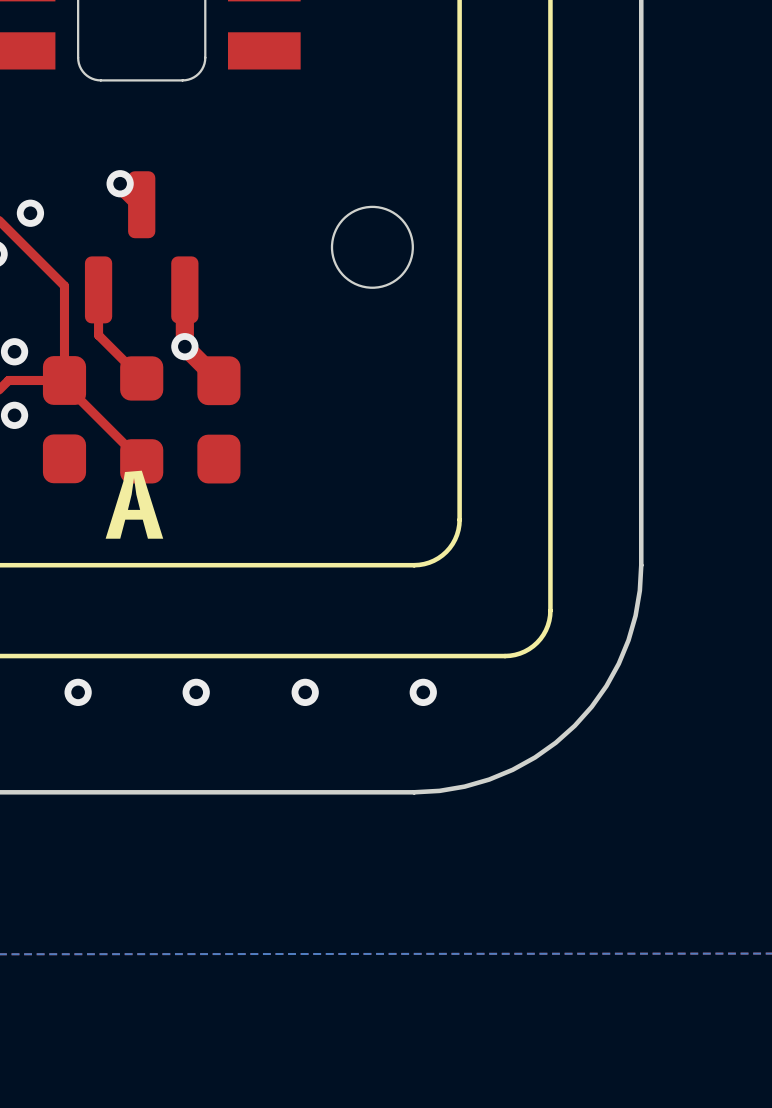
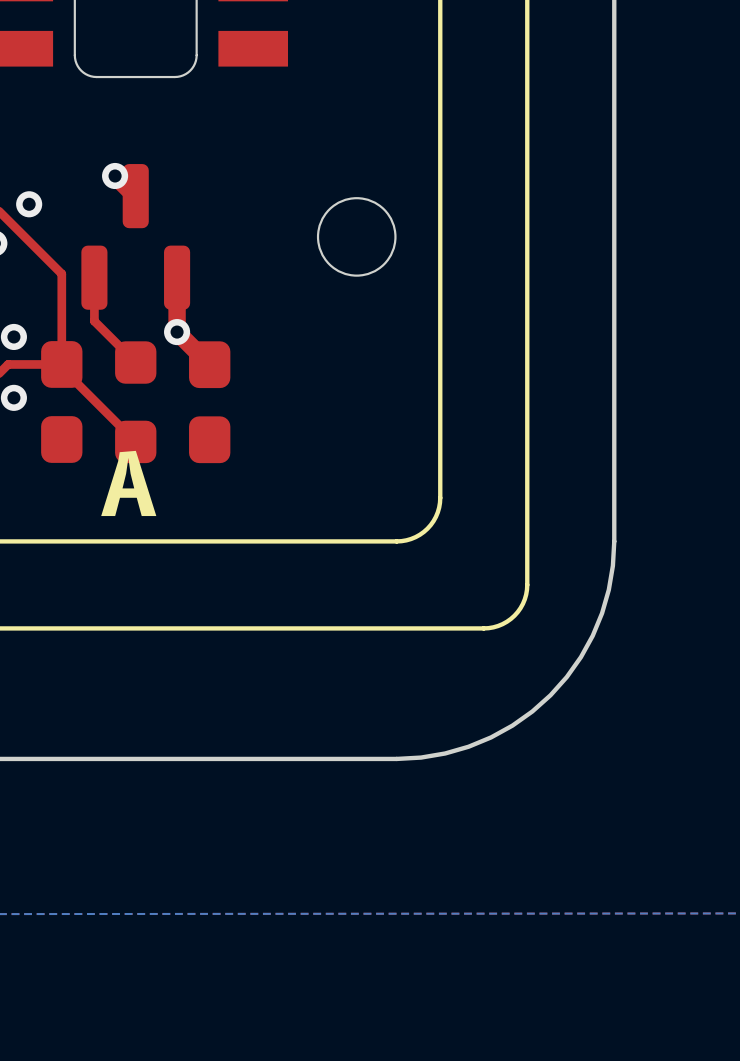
via: (78, 692) -> none
via: (196, 692) -> none
via: (305, 692) -> none
via: (423, 692) -> none

